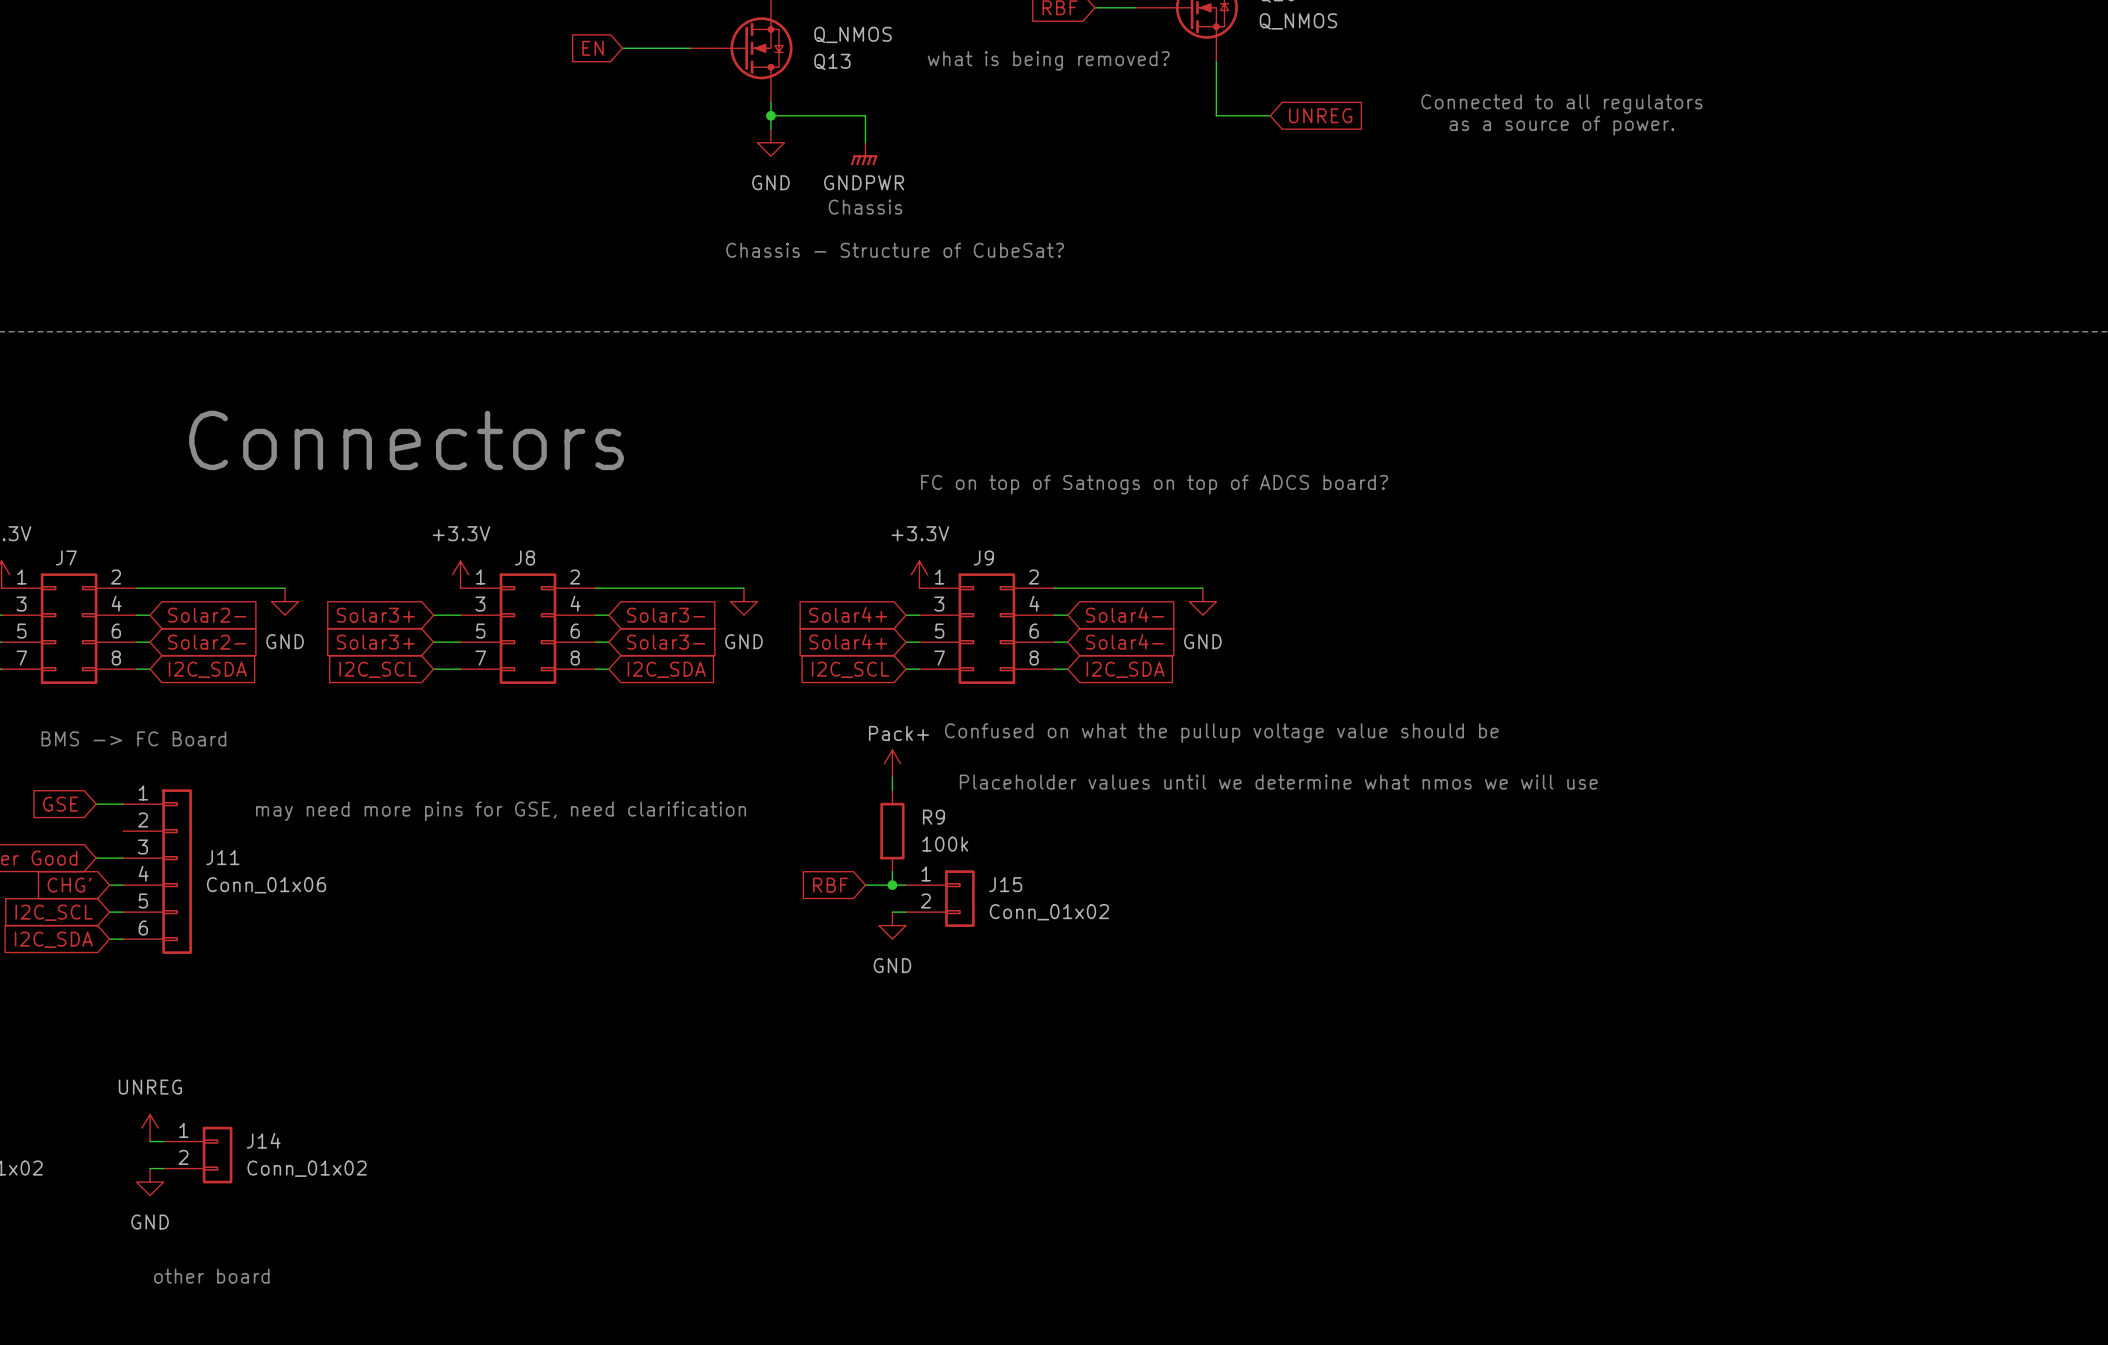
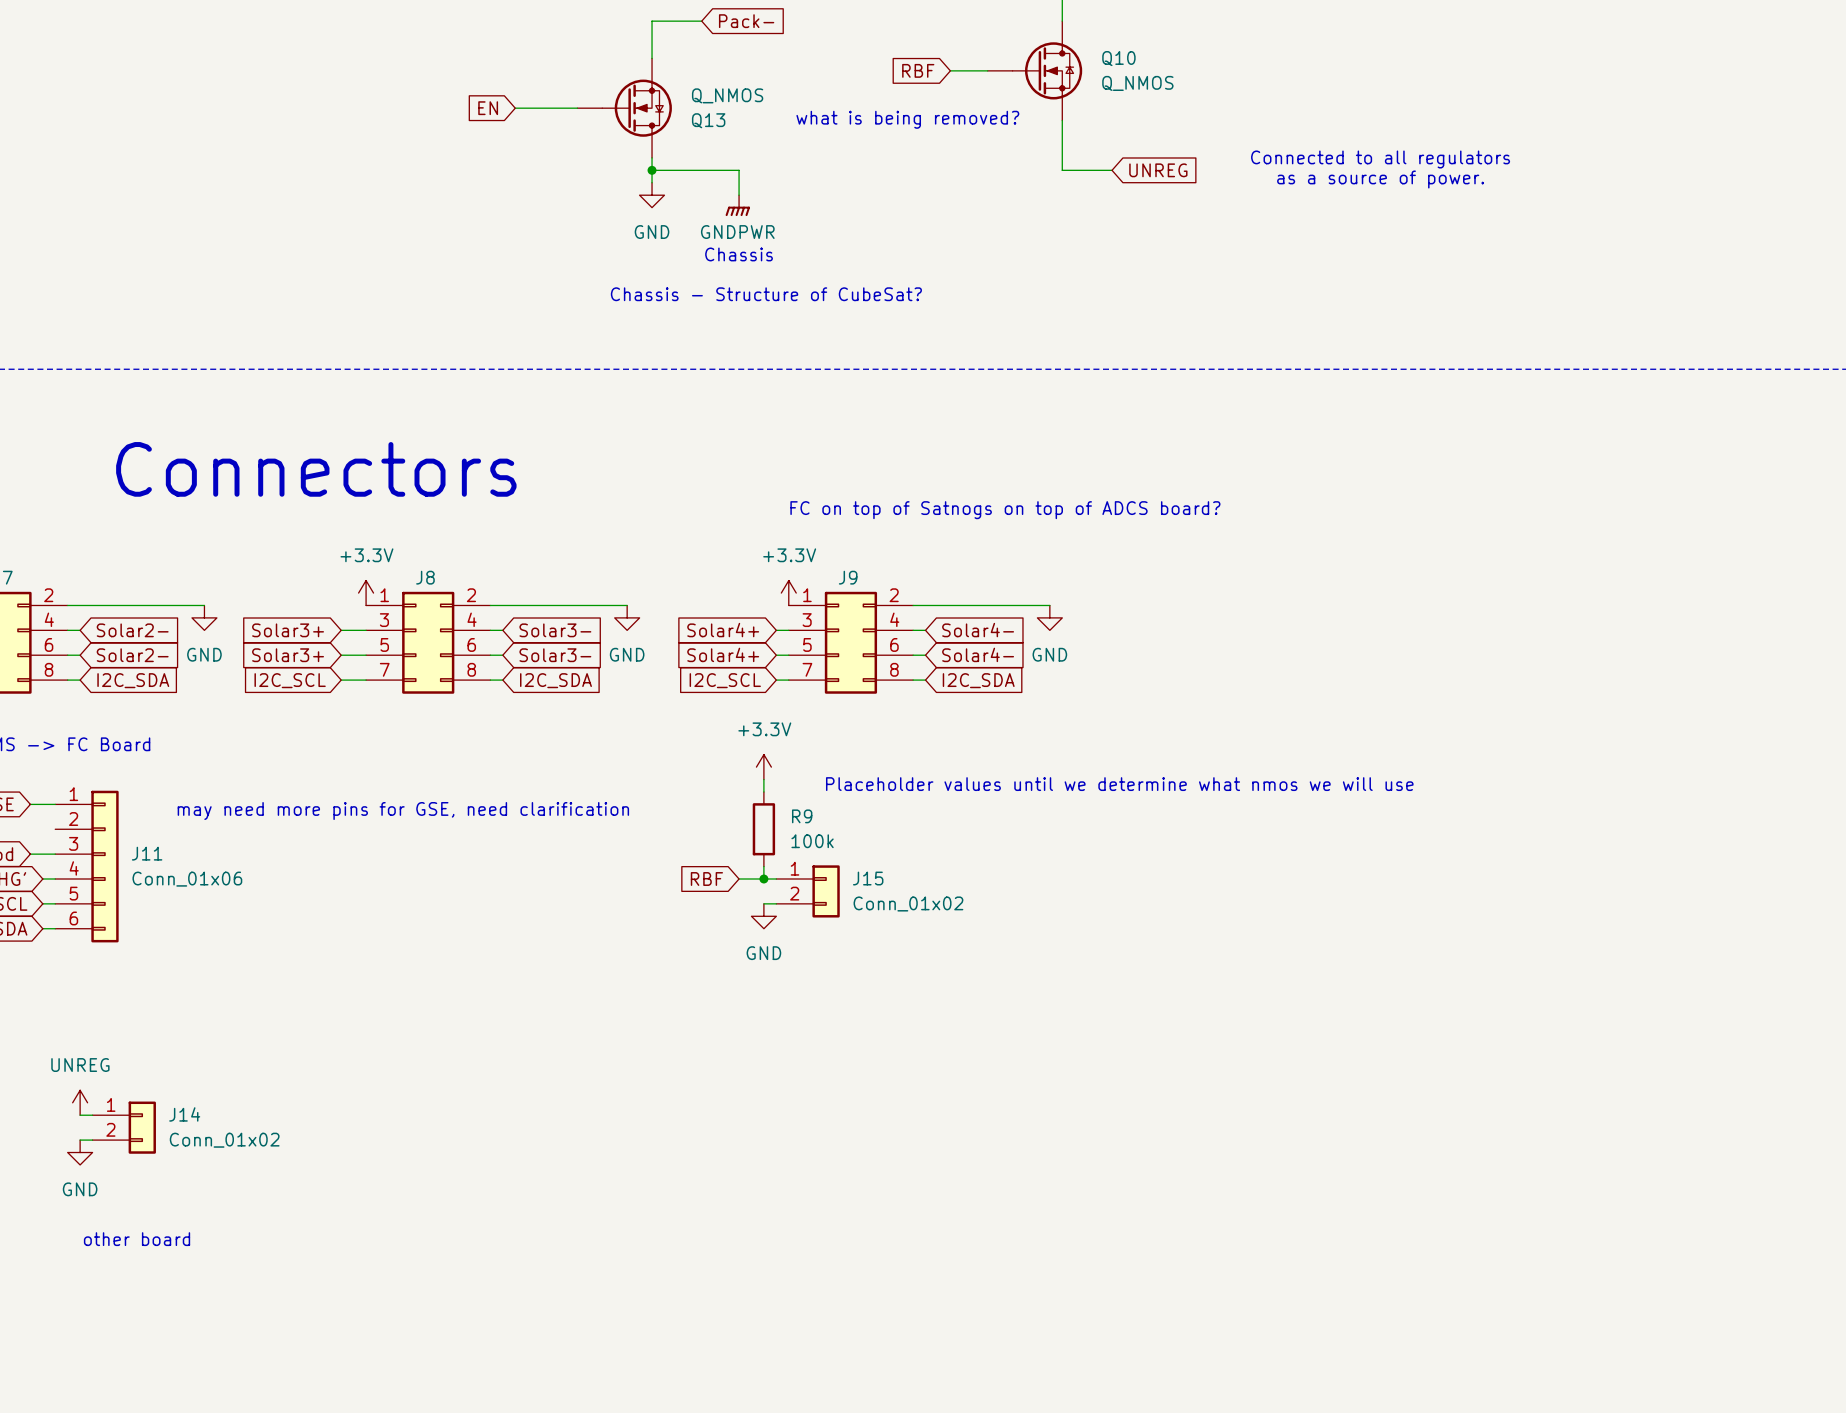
text: Confused on what the pullup voltage value should be (1221, 733) -> none
power symbol: Pack+ (892, 763) -> +3.3V (763, 767)

